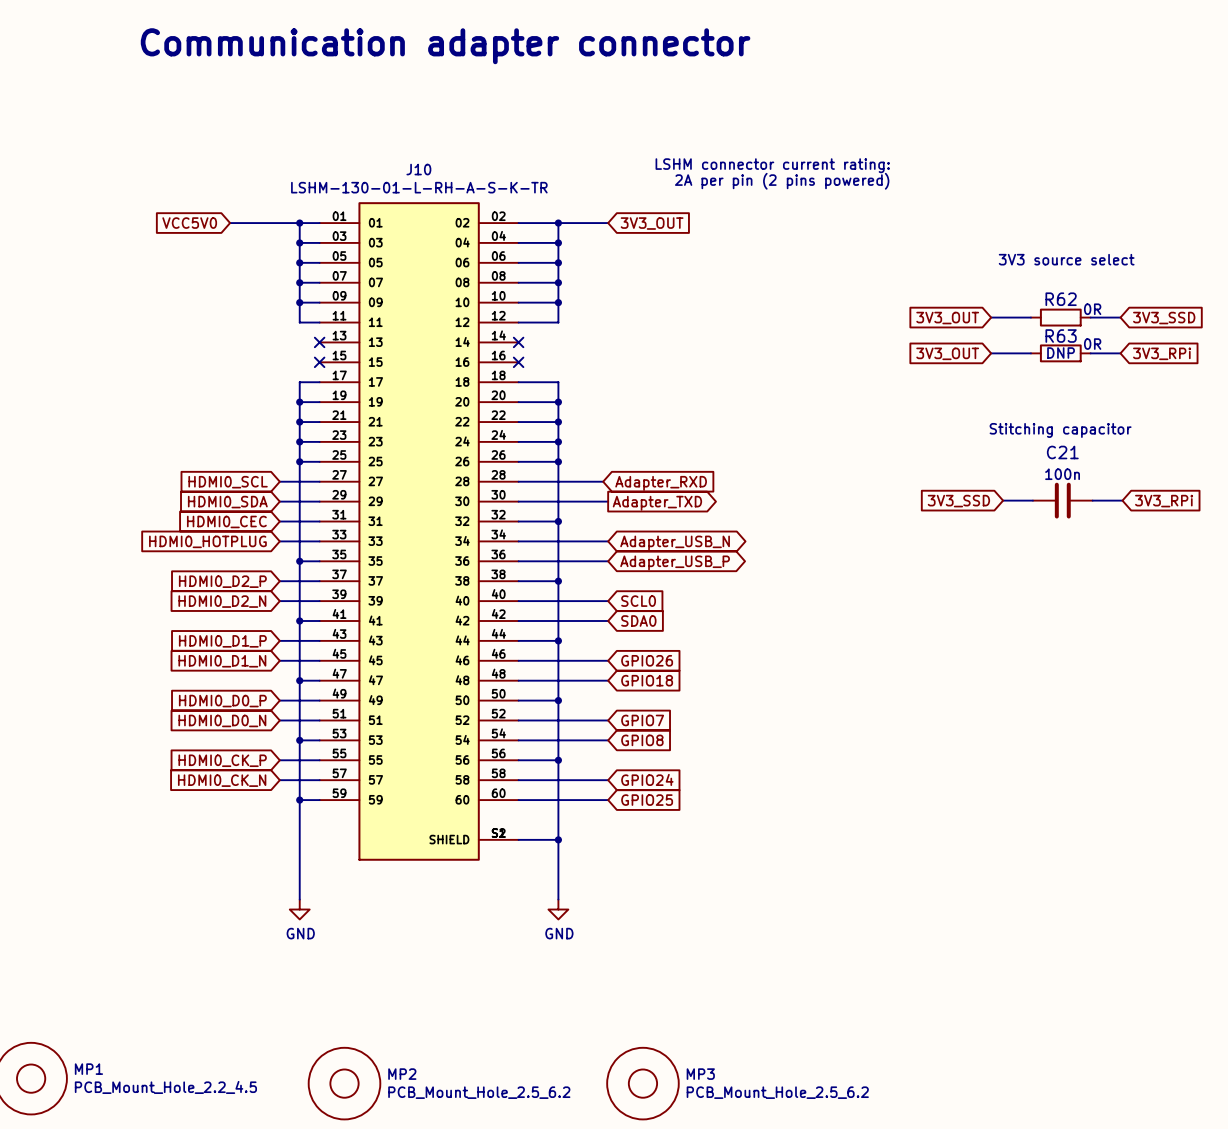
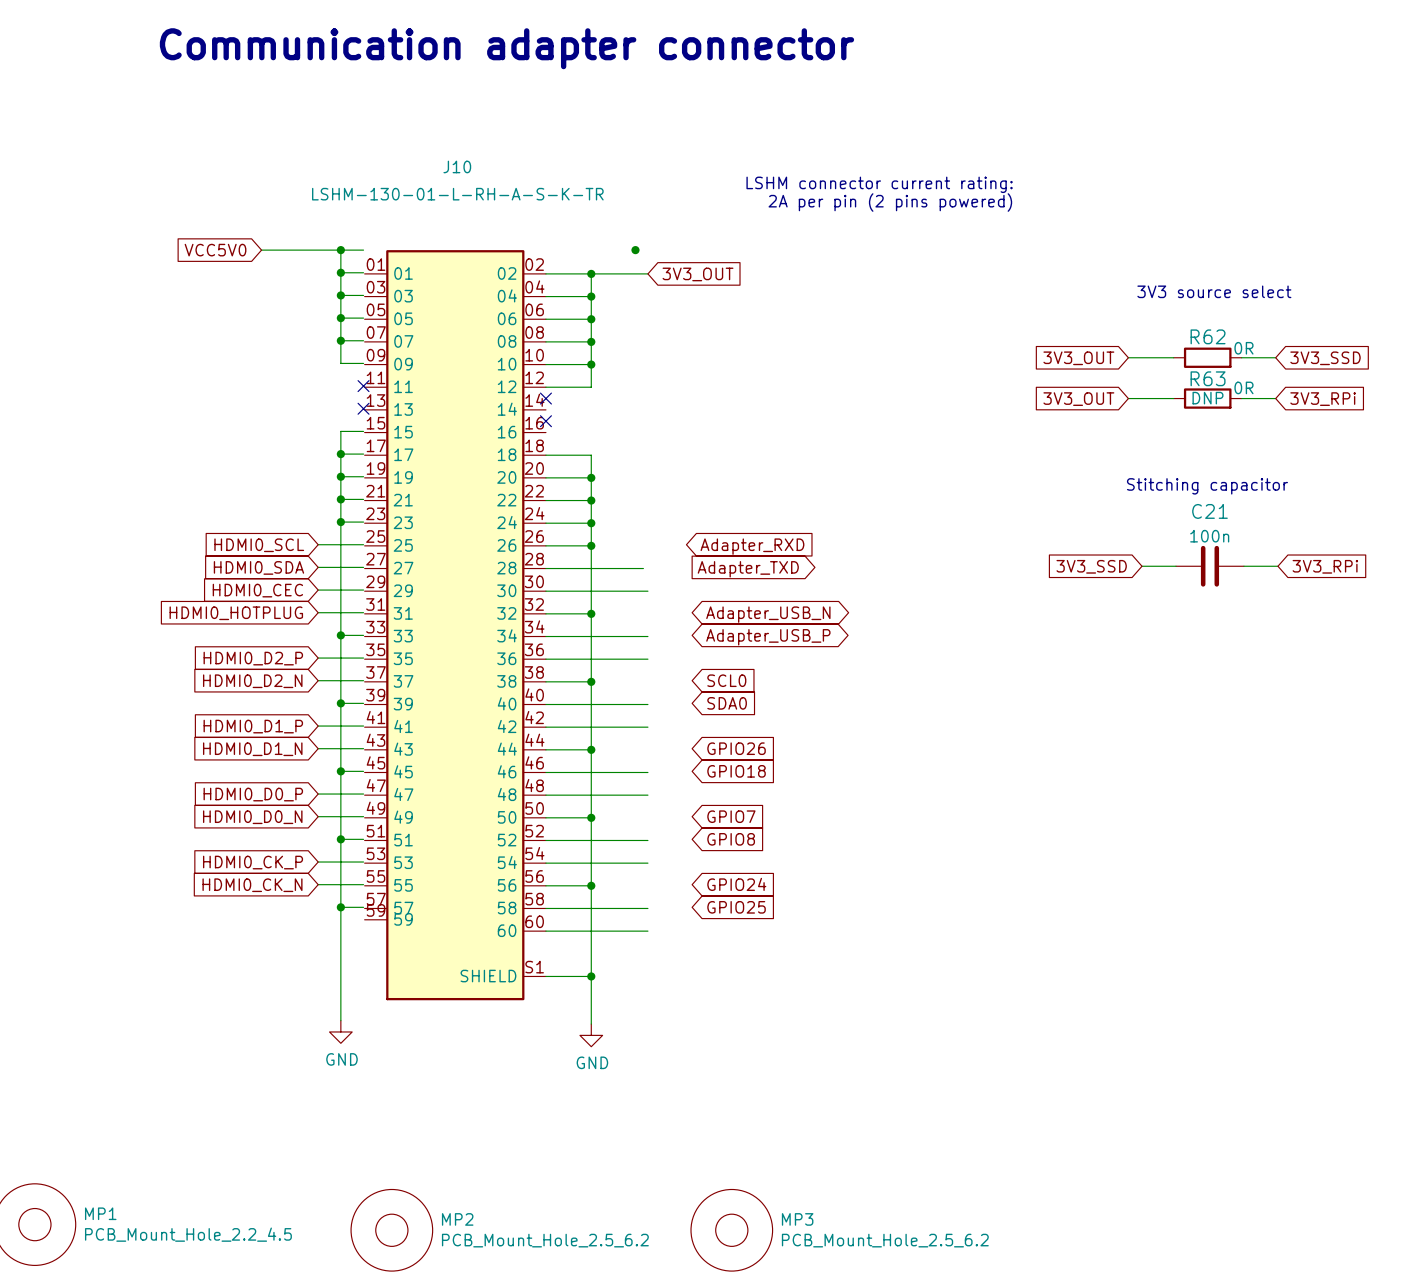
J10 name position: J10 (418, 169) -> J10 (457, 166)
J10 value position: LSHM-130-01-L-RH-A-S-K-TR (419, 187) -> LSHM-130-01-L-RH-A-S-K-TR (457, 194)
J10 symbol: [319, 202, 519, 861] -> [364, 250, 546, 1001]
wire: (518, 223) (608, 223) -> (545, 273) (647, 273)
wire: (558, 223) (558, 322) (518, 322) -> (591, 273) (591, 387) (545, 387)
global label position: 3V3_OUT (652, 223) -> 3V3_OUT (698, 274)
junction: (558, 242) -> none
junction: none -> (591, 273)
wire: (518, 262) (558, 262) -> (545, 319) (591, 319)
junction: (558, 262) -> none
junction: none -> (591, 296)
wire: (518, 282) (558, 282) -> (545, 341) (591, 341)
junction: (558, 282) -> none
junction: none -> (591, 319)
wire: (518, 302) (558, 302) -> (545, 364) (591, 364)
junction: (558, 302) -> none
junction: none -> (591, 341)
junction: none -> (591, 364)
no-connect mark: (518, 342) -> none
no-connect mark: none -> (545, 398)
no-connect mark: (518, 362) -> none
no-connect mark: none -> (545, 421)
wire: (518, 382) (558, 382) (558, 899) -> none
wire: (518, 402) (558, 402) -> (545, 477) (591, 477)
junction: (558, 402) -> none
wire: none -> (545, 455) (591, 455) (591, 1024)
wire: (518, 422) (558, 422) -> (545, 500) (591, 500)
junction: (558, 422) -> none
junction: none -> (591, 477)
wire: (518, 441) (558, 441) -> (545, 523) (591, 523)
junction: (558, 441) -> none
junction: none -> (591, 500)
wire: (518, 461) (558, 461) -> (545, 545) (591, 545)
junction: (558, 461) -> none
junction: none -> (591, 523)
wire: (518, 481) (603, 481) -> none
junction: none -> (591, 545)
wire: (518, 501) (608, 501) -> (545, 591) (647, 591)
wire: none -> (545, 568) (643, 568)
junction: (558, 521) -> none
wire: (518, 541) (608, 541) -> (545, 636) (647, 636)
junction: none -> (591, 613)
wire: (518, 561) (608, 561) -> (545, 659) (647, 659)
junction: (558, 581) -> none
wire: (518, 601) (608, 601) -> (545, 704) (647, 704)
junction: none -> (591, 681)
wire: (518, 621) (608, 621) -> (545, 727) (647, 727)
junction: (558, 640) -> none
wire: (518, 660) (608, 660) -> (545, 772) (647, 772)
junction: none -> (591, 749)
wire: (518, 680) (608, 680) -> (545, 795) (647, 795)
junction: (558, 700) -> none
wire: (518, 720) (608, 720) -> (545, 840) (647, 840)
junction: none -> (591, 817)
wire: (518, 740) (608, 740) -> (545, 863) (647, 863)
junction: (558, 760) -> none
wire: (518, 780) (608, 780) -> (545, 908) (647, 908)
junction: none -> (591, 885)
wire: (518, 800) (608, 800) -> (545, 931) (647, 931)
wire: (518, 839) (558, 839) -> (545, 976) (591, 976)
junction: (558, 839) -> none
junction: none -> (591, 976)
power symbol position: GND (558, 909) -> GND (591, 1035)

